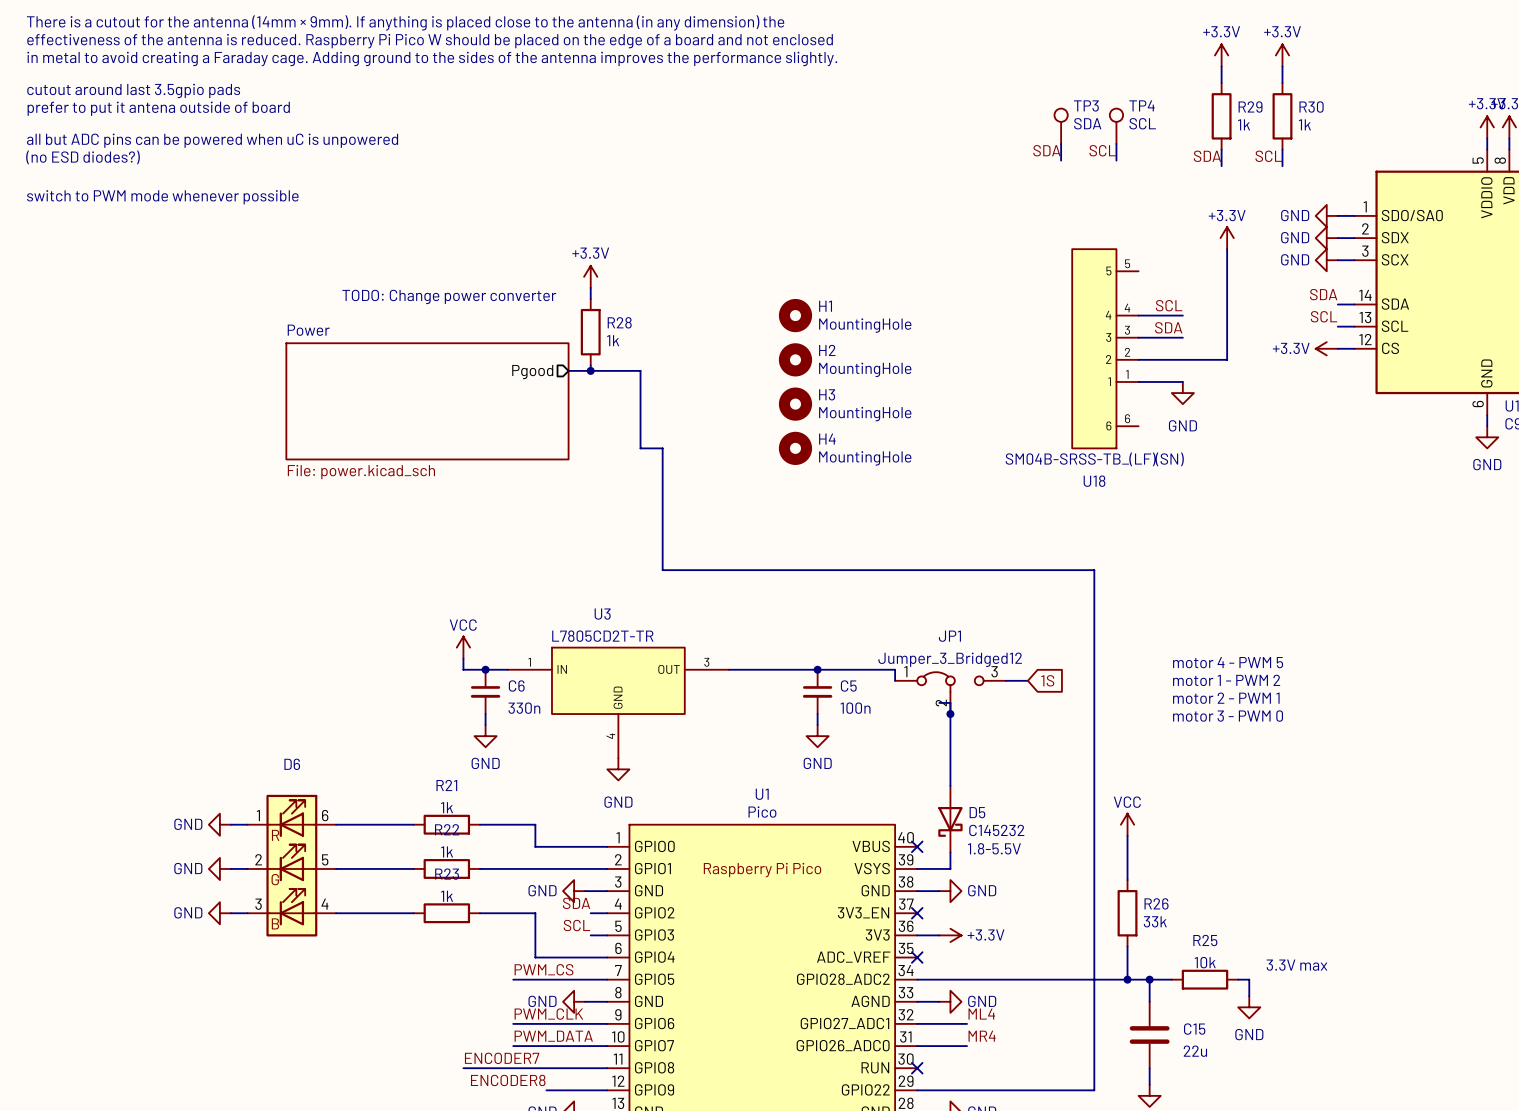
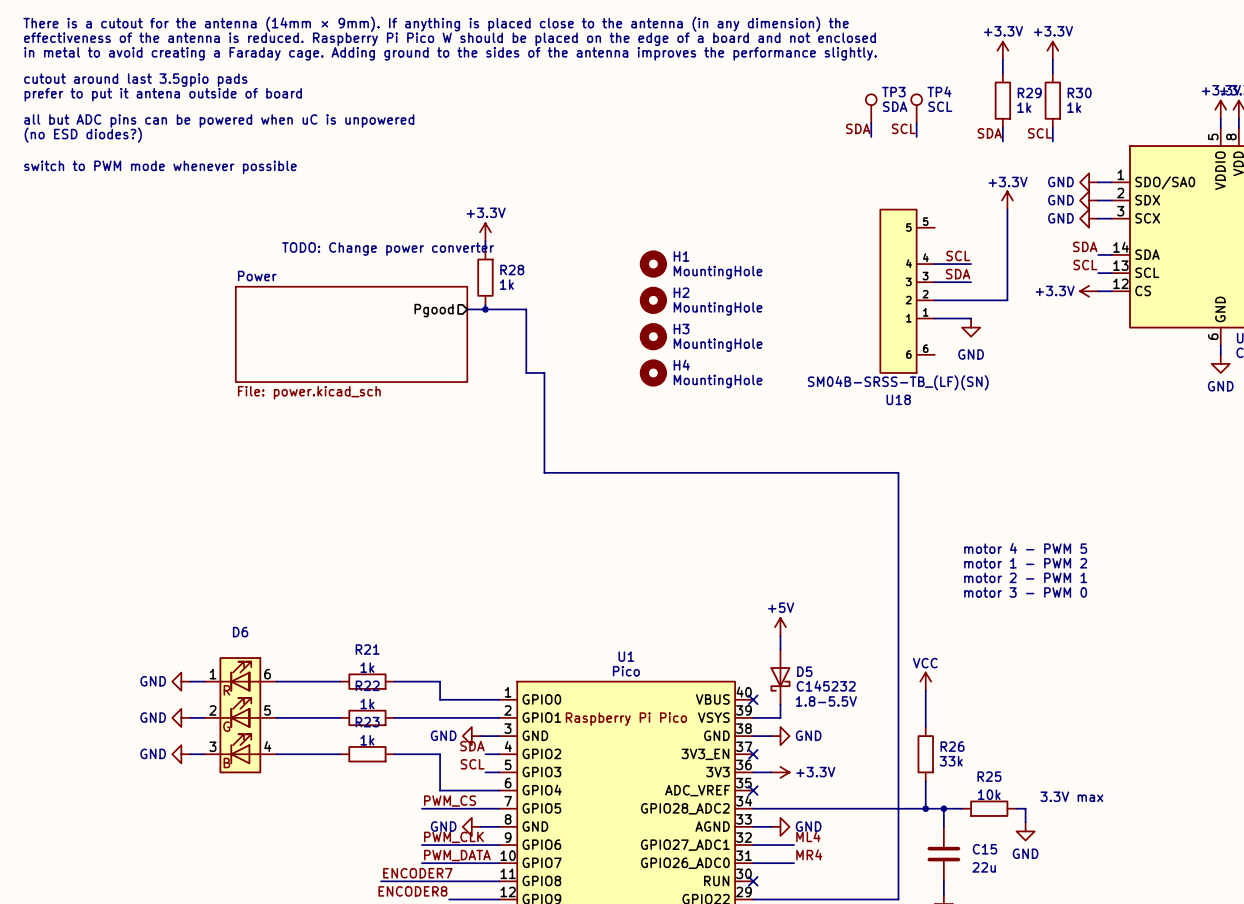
power symbol: VCC (463, 647) -> none
wire: (463, 658) (463, 669) (507, 669) -> none
junction: (485, 669) -> none
wire: (729, 669) (895, 669) (895, 680) -> none
junction: (817, 669) -> none
wire: (1005, 680) (1027, 680) -> none
global label: 1S (1047, 680) -> none
C6: 330n (485, 691) -> none
C5: 100n (817, 691) -> none
JP1: Jumper_3_Bridged12 (950, 693) -> none
U3: L7805CD2T-TR (618, 702) -> none
wire: (939, 702) (950, 702) (950, 769) -> none
wire: (485, 714) (485, 725) -> none
wire: (817, 714) (817, 725) -> none
junction: (950, 714) -> none
power symbol: GND (485, 736) -> none
power symbol: GND (817, 736) -> none
power symbol: none -> +5V (780, 627)
power symbol: GND (618, 769) -> none

